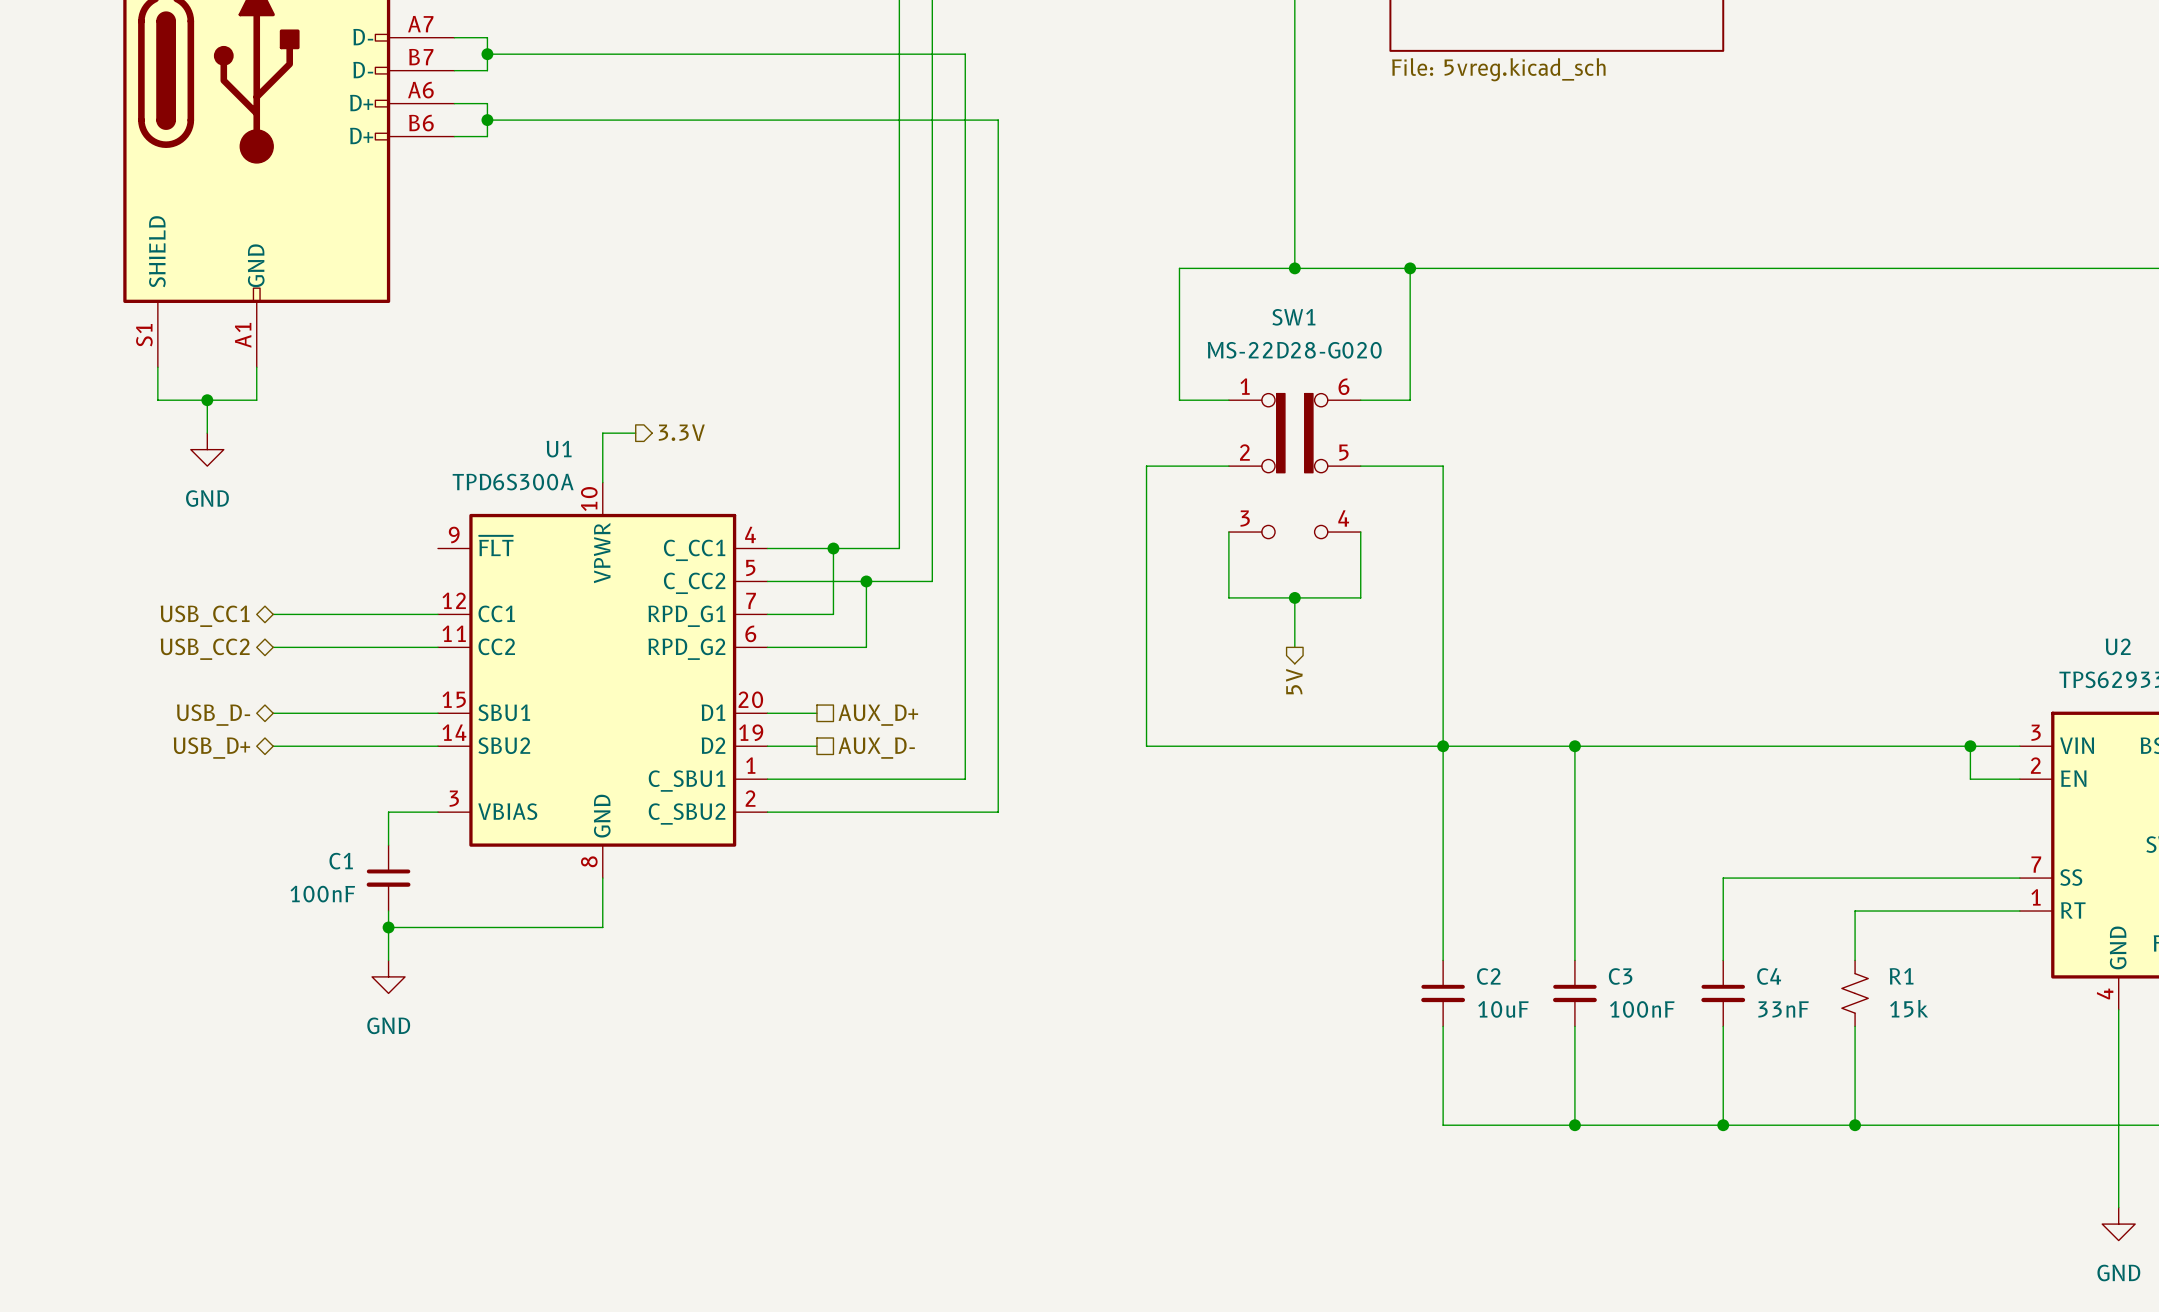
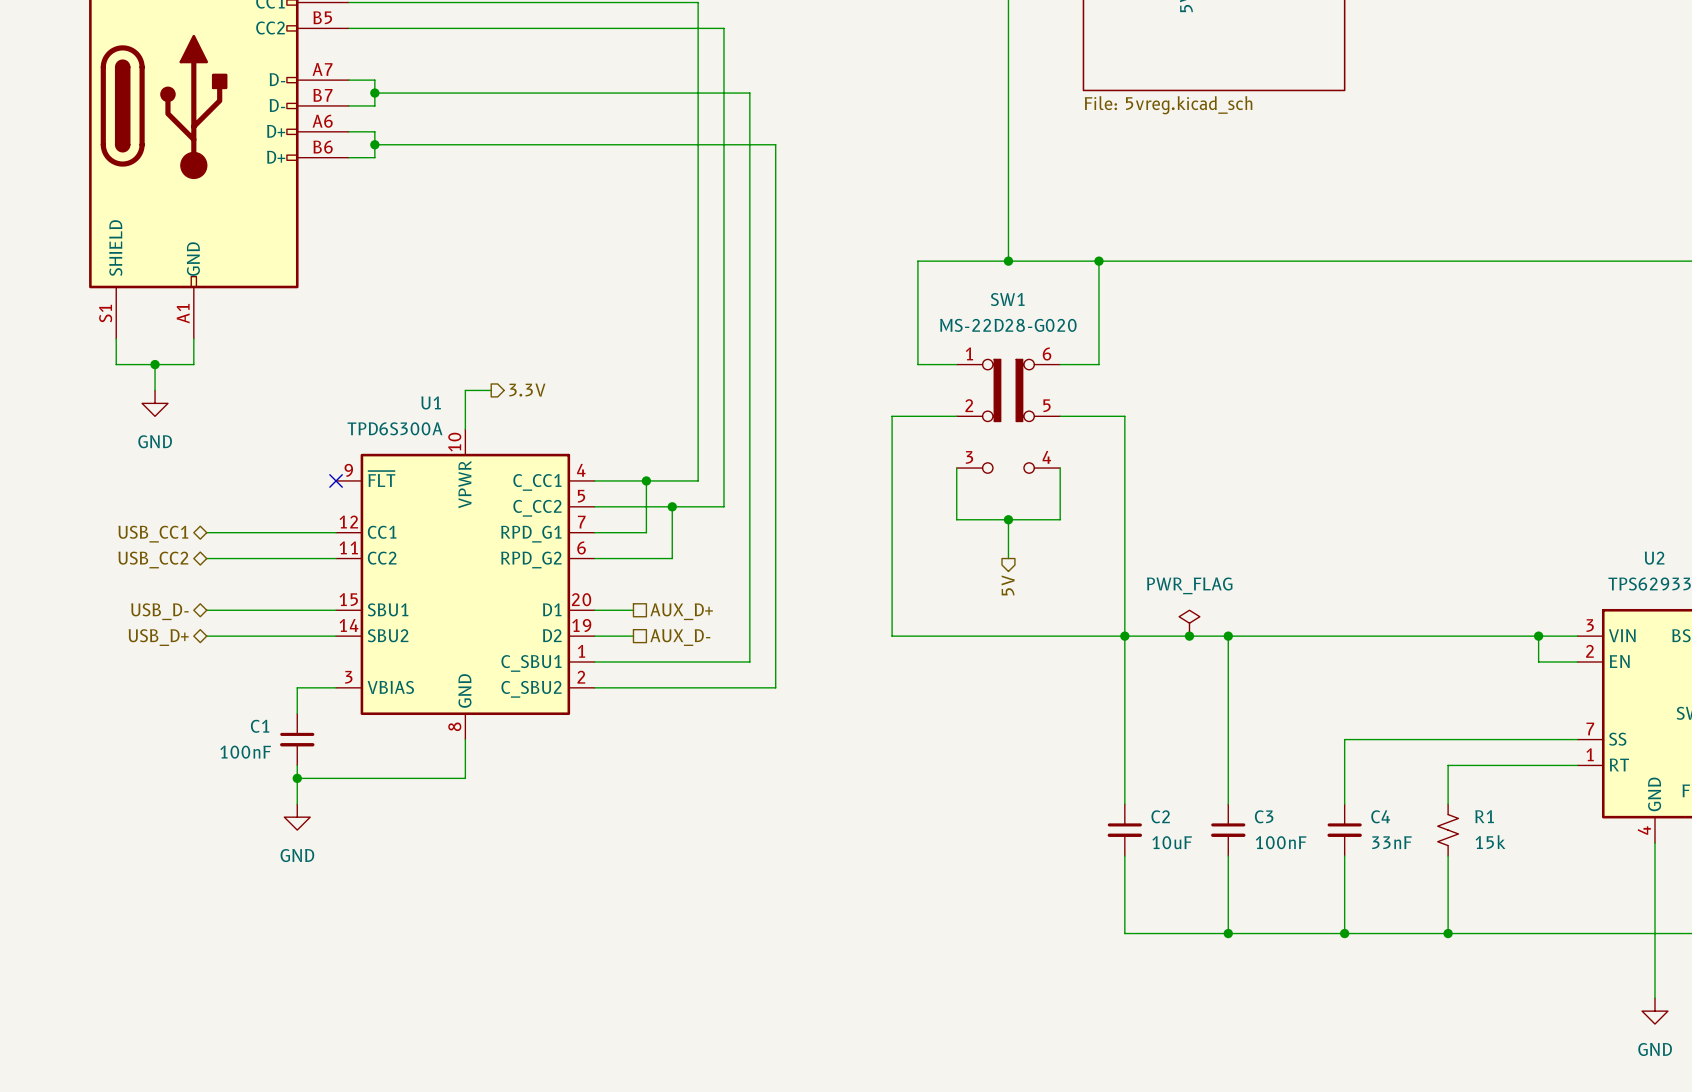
no-connect mark: none -> (336, 480)
power symbol: none -> PWR_FLAG (1189, 623)
junction: none -> (1189, 636)

